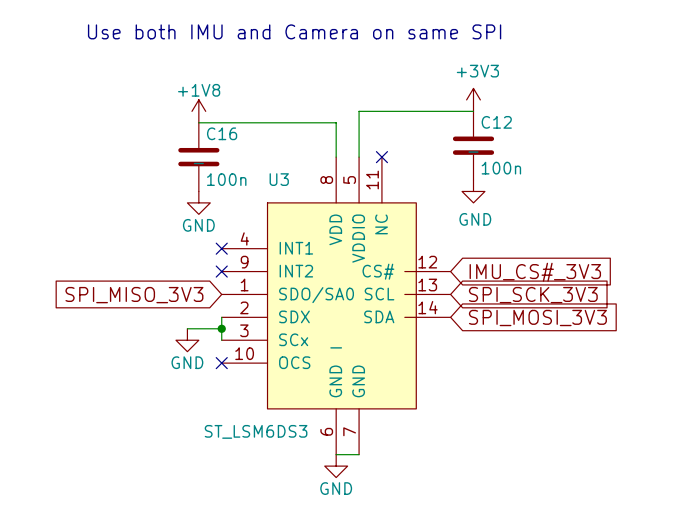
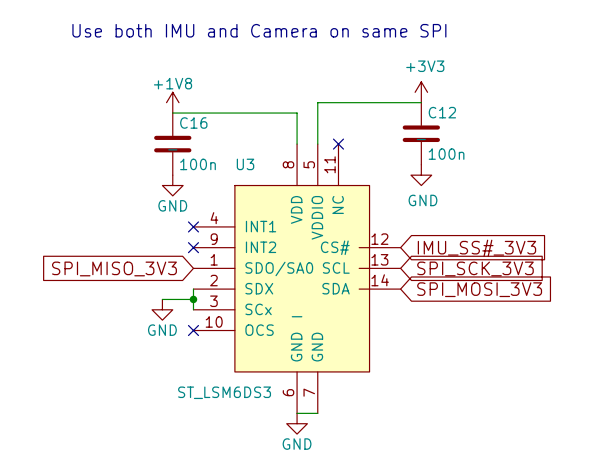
global label: IMU_CS#_3V3 (535, 272) -> IMU_SS#_3V3 (476, 248)

